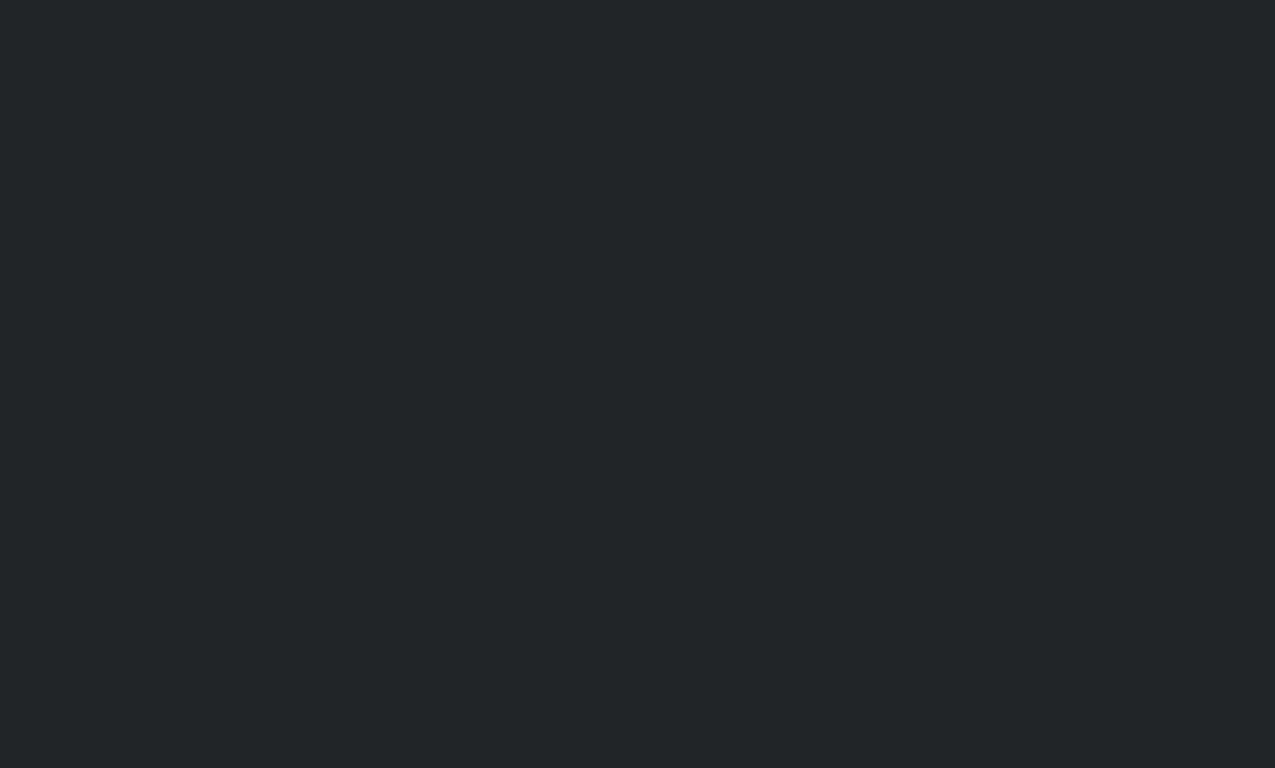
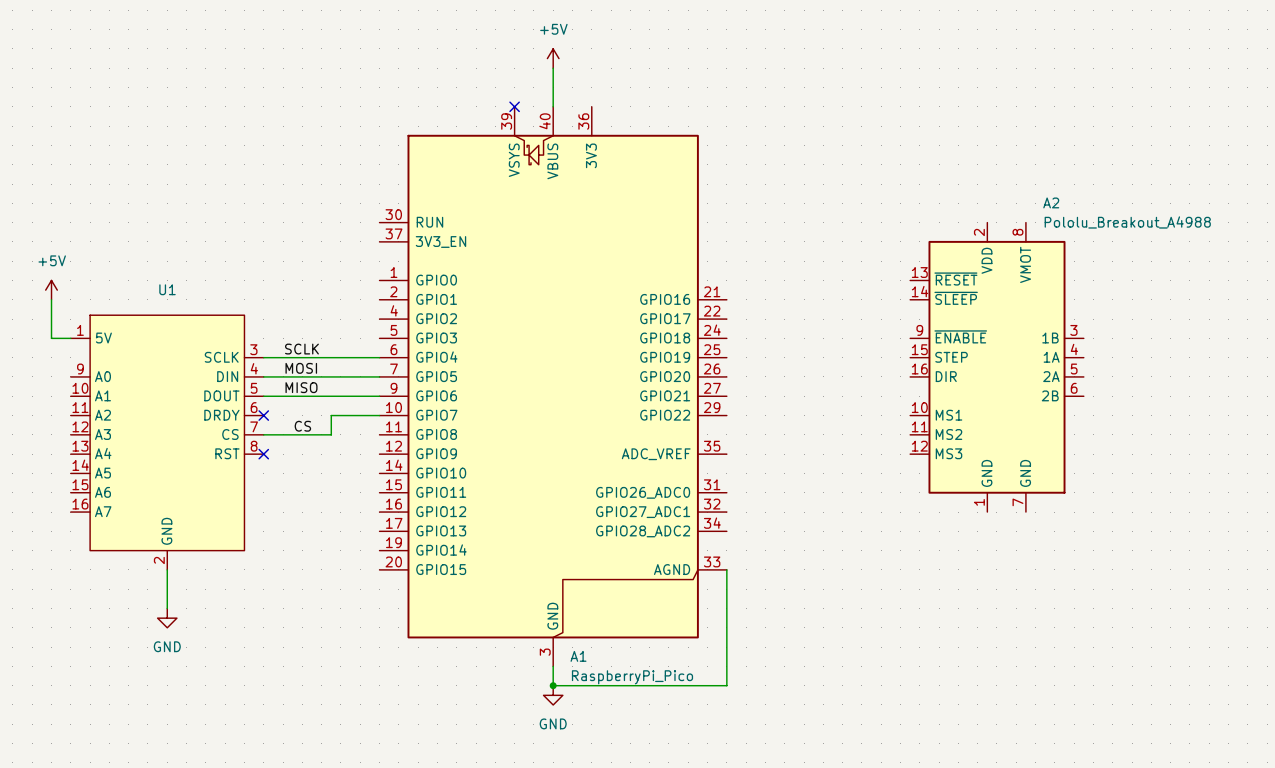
power symbol: none -> +5V (553, 58)
wire: none -> (553, 68) (553, 106)
no-connect mark: none -> (514, 106)
power symbol: none -> +5V (51, 290)
wire: none -> (51, 299) (51, 338) (70, 338)
label: none -> SCLK (301, 349)
wire: none -> (263, 357) (379, 357)
A2: none -> Pololu_Breakout_A4988 (996, 367)
label: none -> MOSI (301, 368)
wire: none -> (263, 376) (379, 376)
A1: none -> RaspberryPi_Pico (553, 386)
label: none -> MISO (301, 387)
wire: none -> (263, 396) (379, 396)
no-connect mark: none -> (263, 415)
wire: none -> (379, 415) (331, 415) (331, 434) (263, 434)
label: none -> CS (302, 426)
U1: none -> (167, 442)
no-connect mark: none -> (263, 454)
wire: none -> (167, 569) (167, 608)
wire: none -> (726, 569) (726, 685) (553, 685) (553, 666)
power symbol: none -> GND (167, 618)
junction: none -> (553, 685)
power symbol: none -> GND (553, 695)

